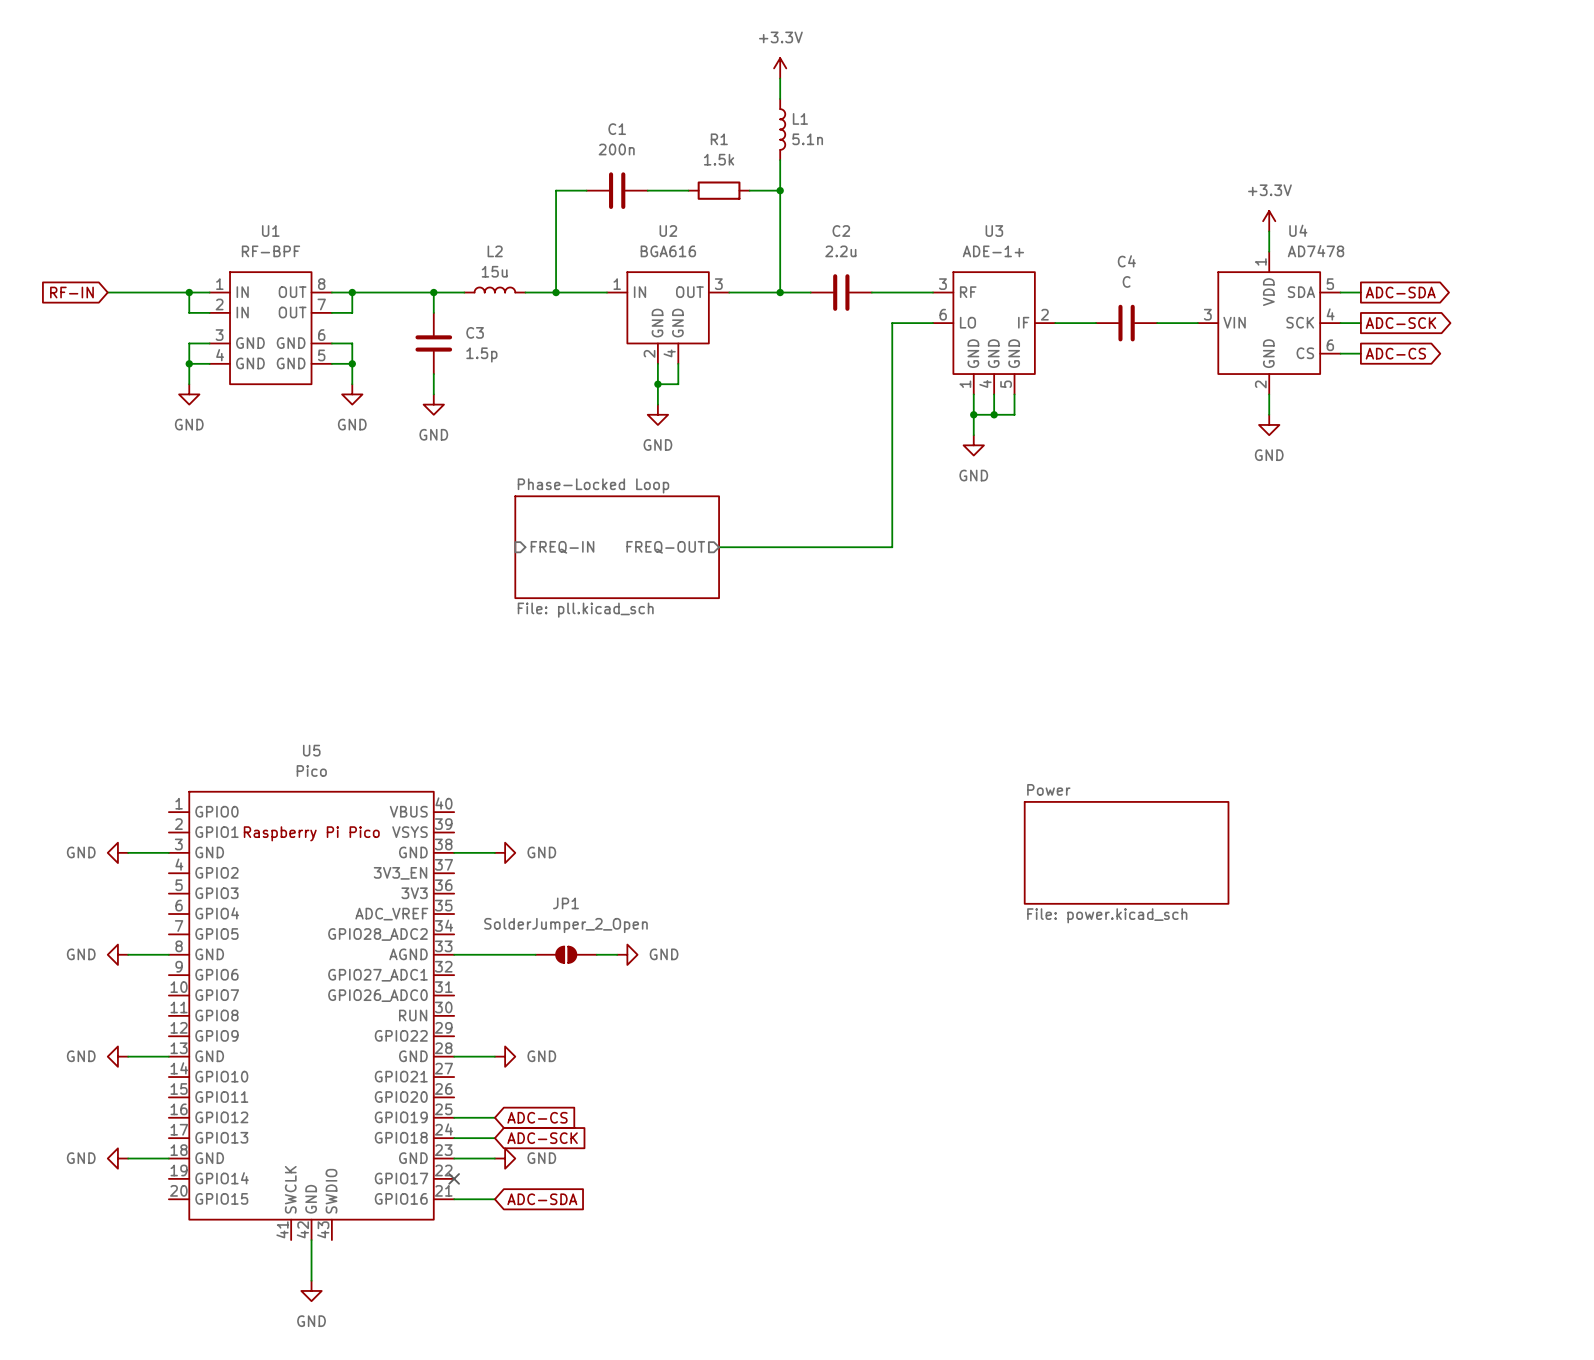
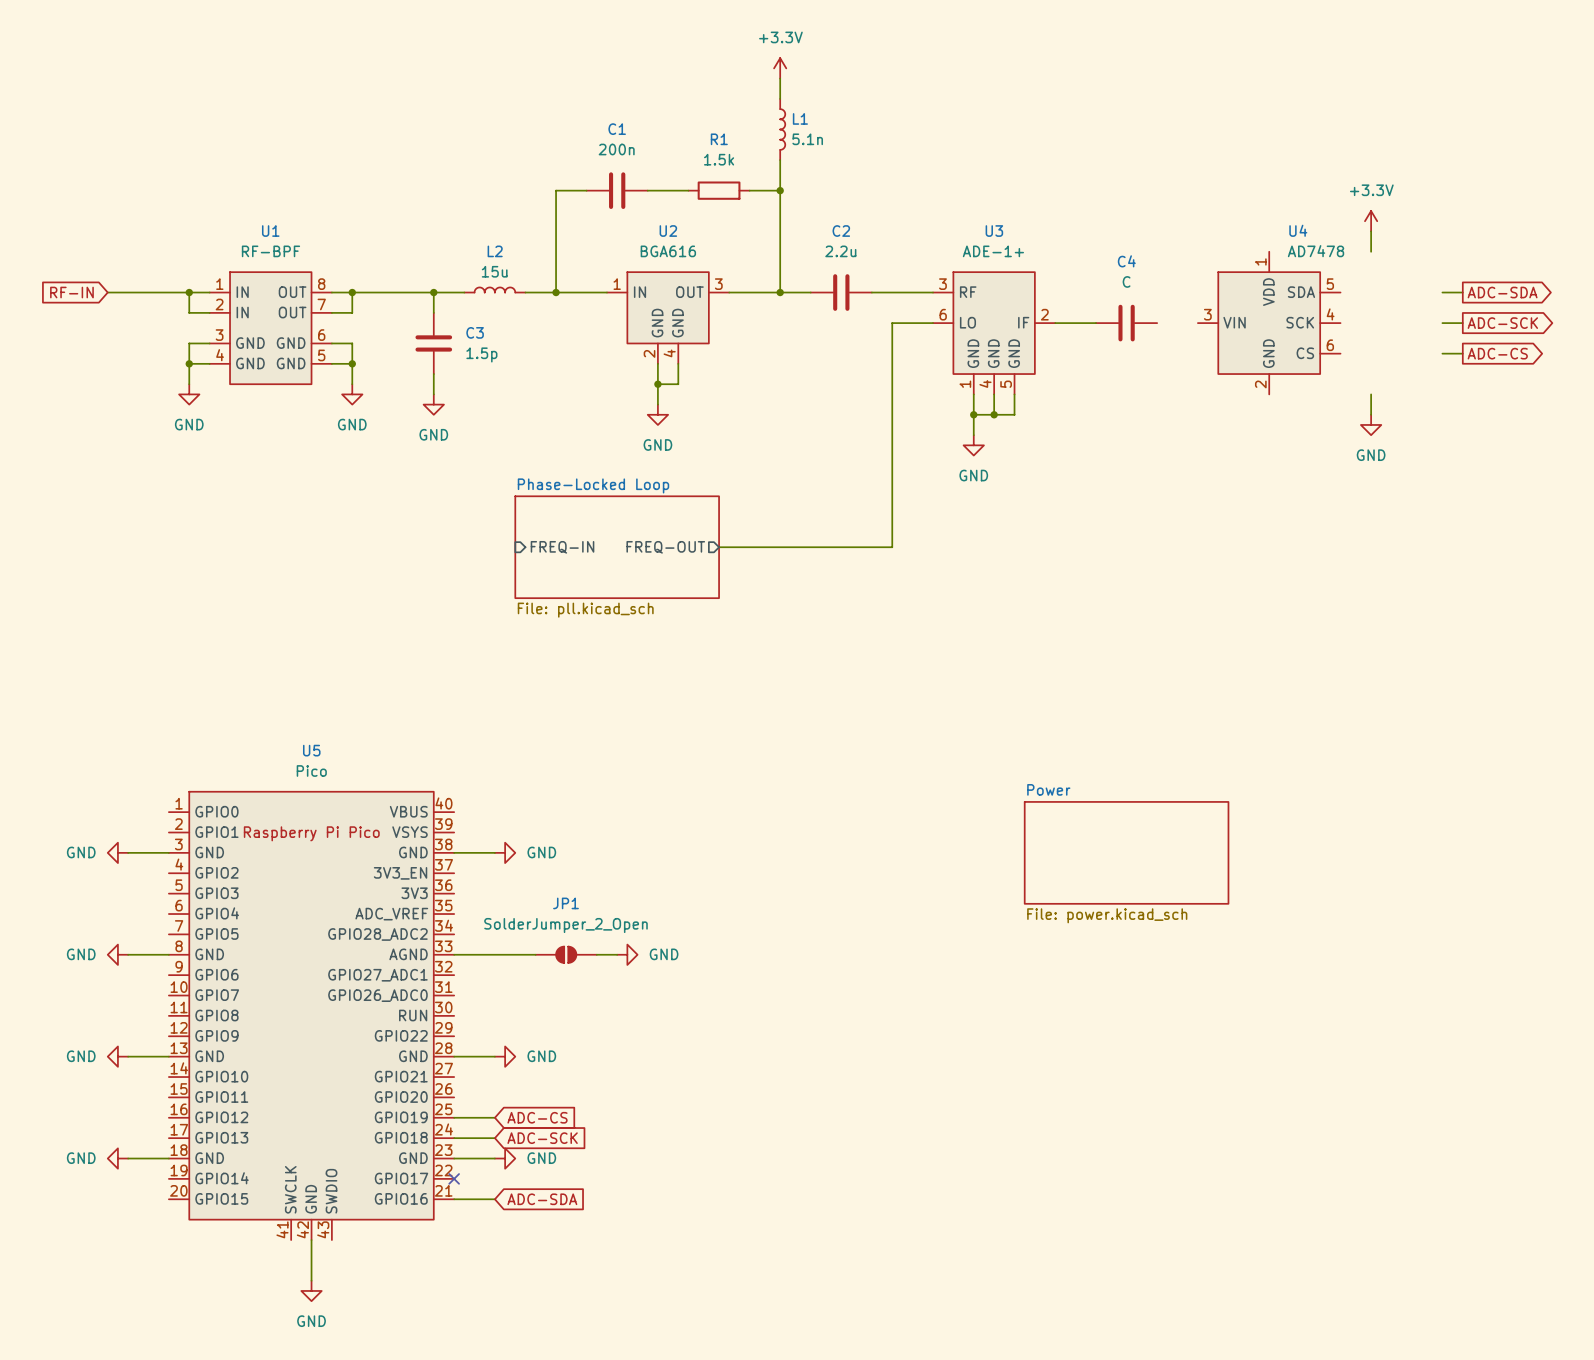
power symbol position: +3.3V (1269, 221) -> +3.3V (1371, 221)
wire: (1269, 231) (1269, 251) -> (1371, 231) (1371, 251)
wire: (1340, 292) (1360, 292) -> (1442, 292) (1462, 292)
global label position: ADC-SDA (1400, 292) -> ADC-SDA (1502, 292)
wire: (1157, 323) (1197, 323) -> none
wire: (1340, 323) (1360, 323) -> (1442, 323) (1462, 323)
global label position: ADC-SCK (1400, 323) -> ADC-SCK (1502, 323)
wire: (1340, 353) (1360, 353) -> (1442, 353) (1462, 353)
global label position: ADC-CS (1395, 353) -> ADC-CS (1497, 353)
wire: (1269, 394) (1269, 414) -> (1371, 394) (1371, 414)
power symbol position: GND (1269, 424) -> GND (1371, 424)

